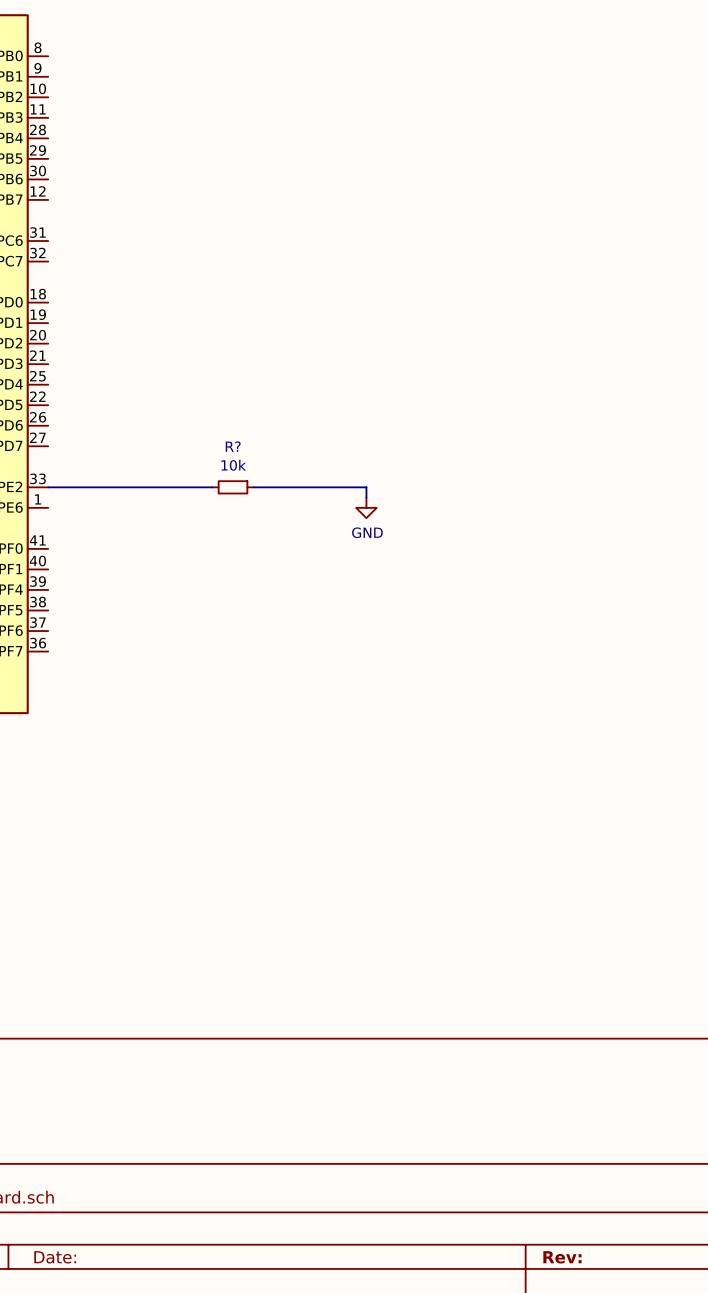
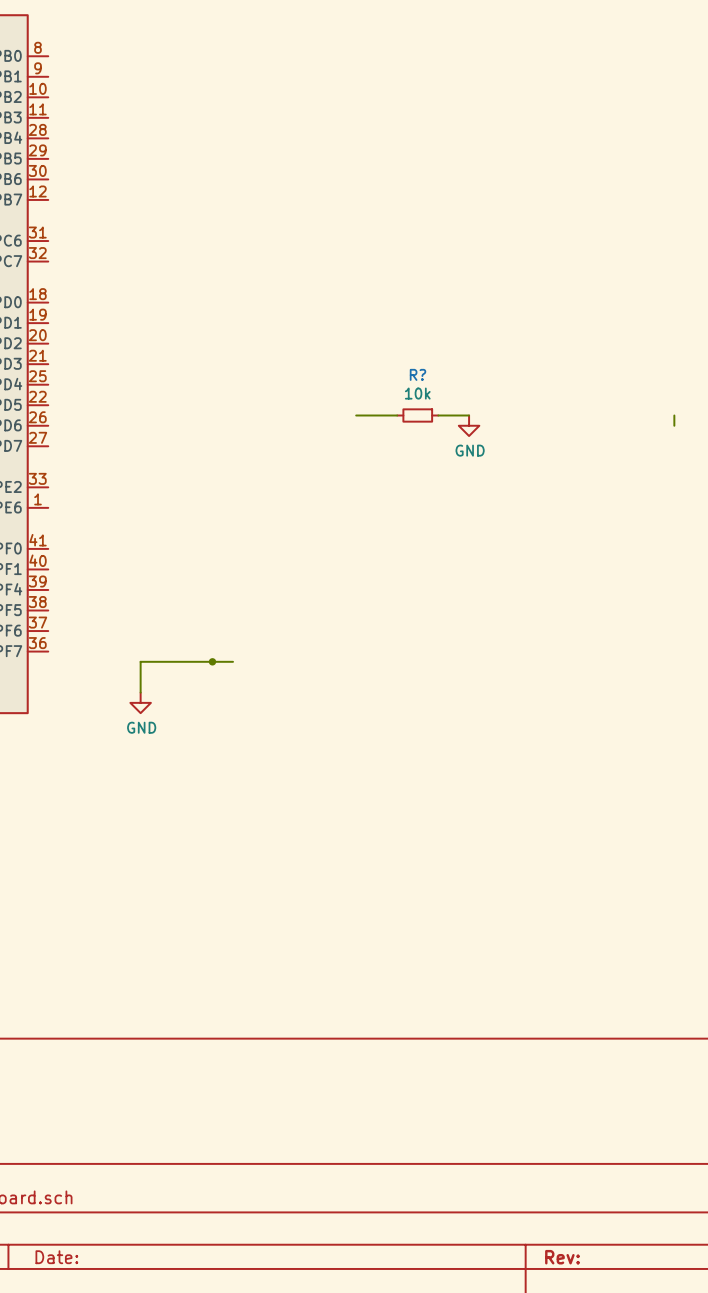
wire: none -> (356, 415) (397, 415)
wire: none -> (438, 415) (469, 415)
wire: none -> (674, 415) (674, 425)
wire: (48, 487) (212, 487) -> none
R? position: (233, 487) -> (417, 415)
wire: (253, 487) (366, 487) (366, 497) -> none
power symbol position: GND (366, 507) -> GND (469, 425)
junction: none -> (212, 661)
wire: none -> (233, 661) (140, 661) (140, 692)
power symbol: none -> GND (140, 702)

